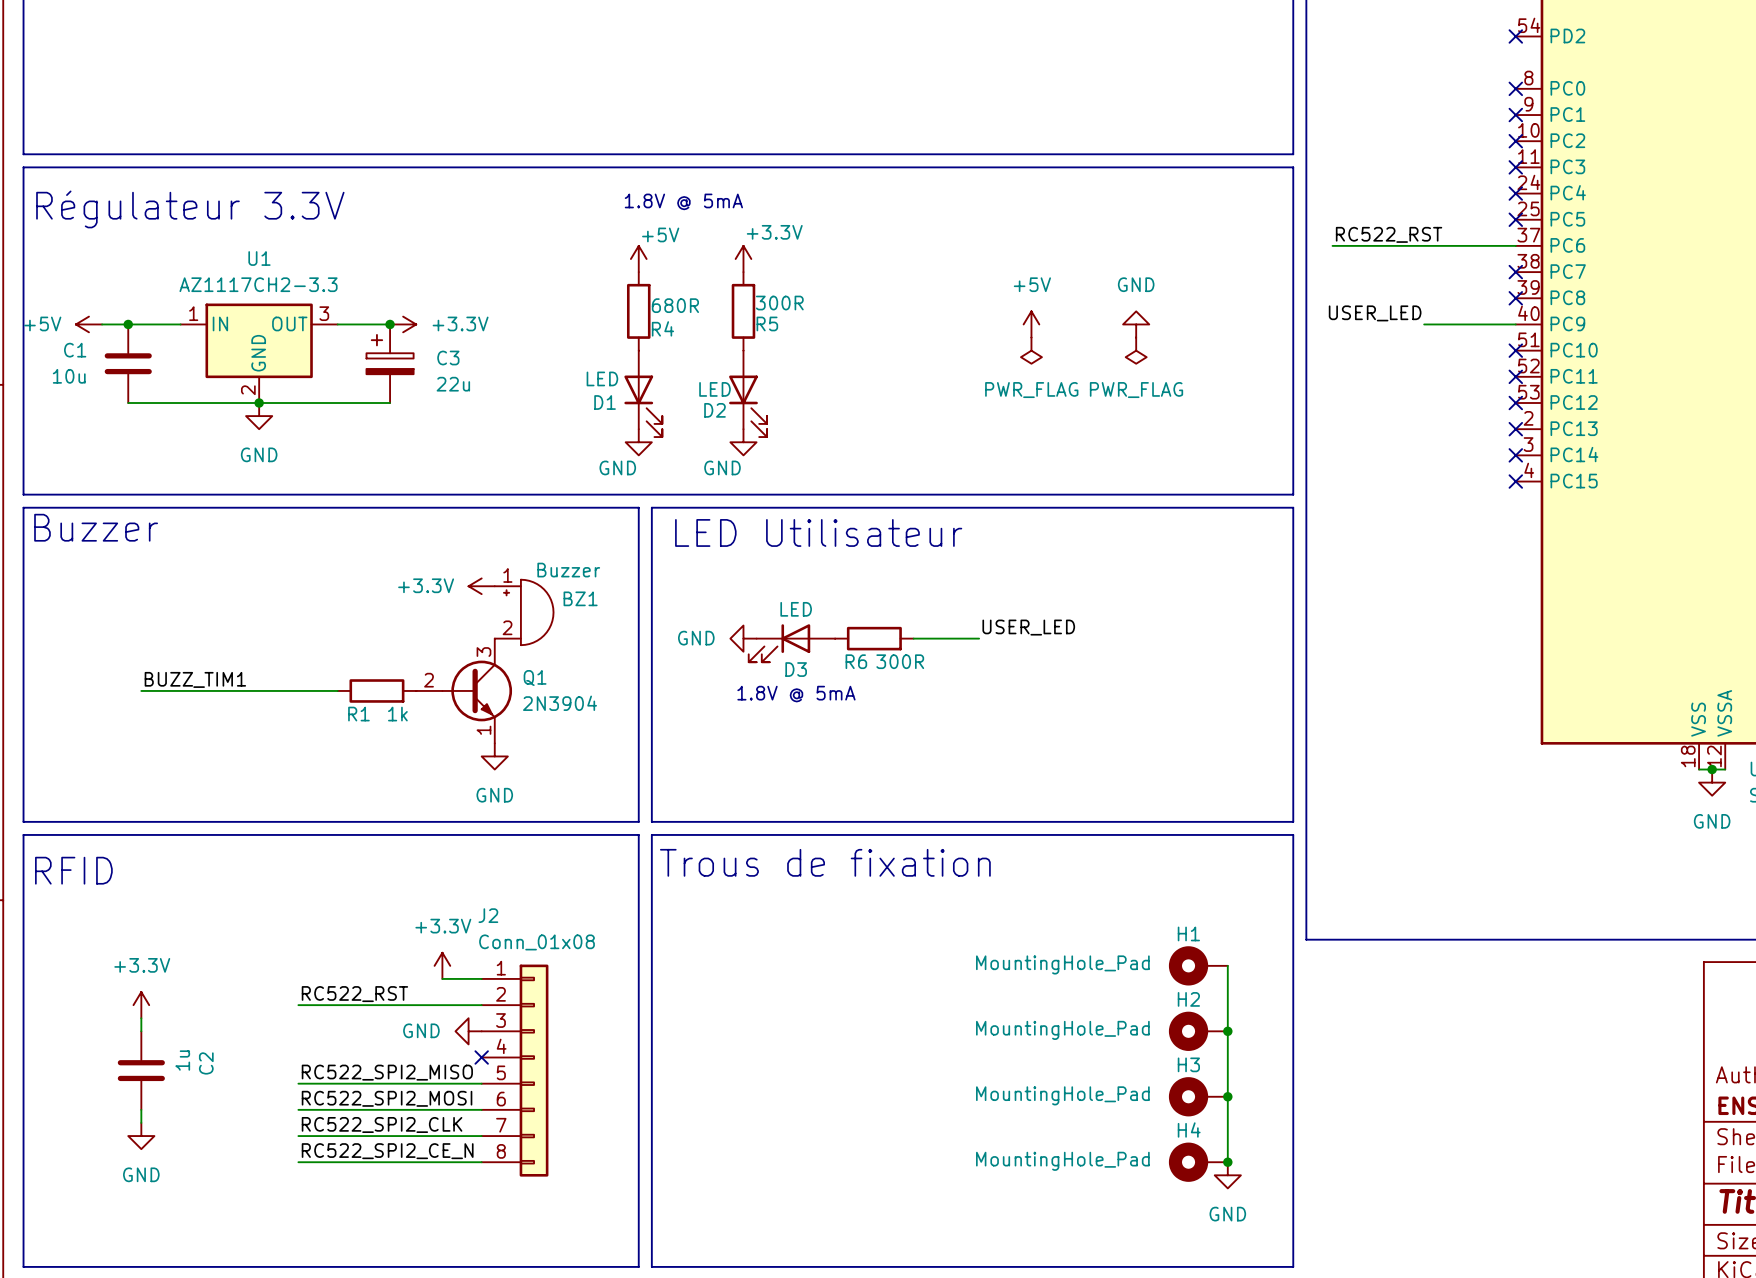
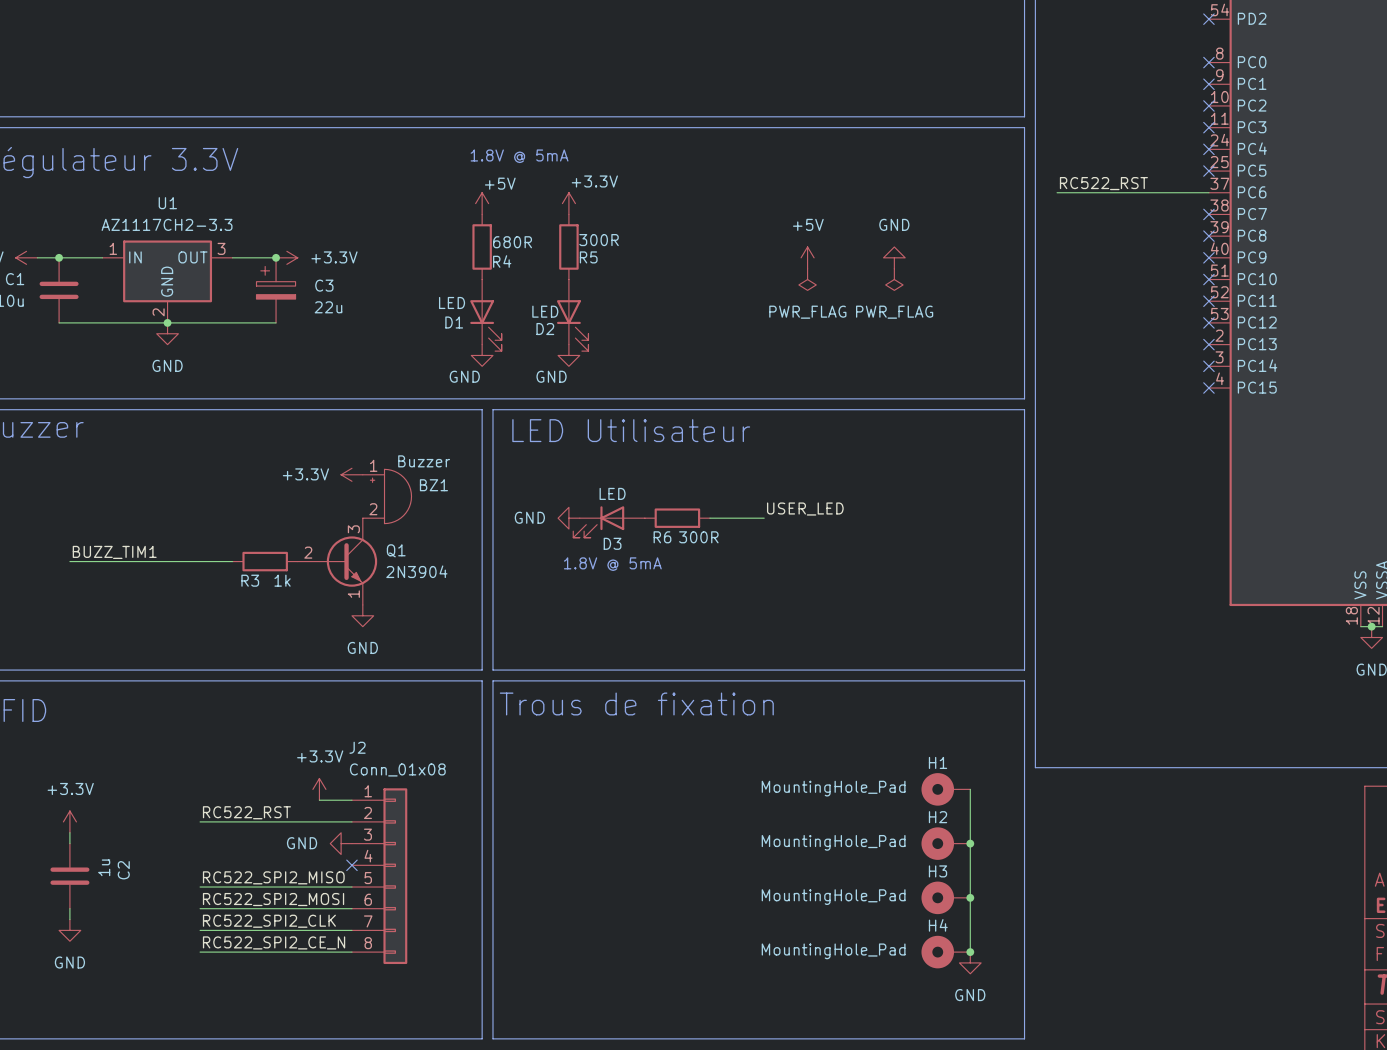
label: USER_LED (1375, 313) -> none
wire: (1424, 324) (1515, 324) -> none
no-connect mark: none -> (1208, 257)
R1 name: R1 (358, 714) -> R3 (250, 580)

